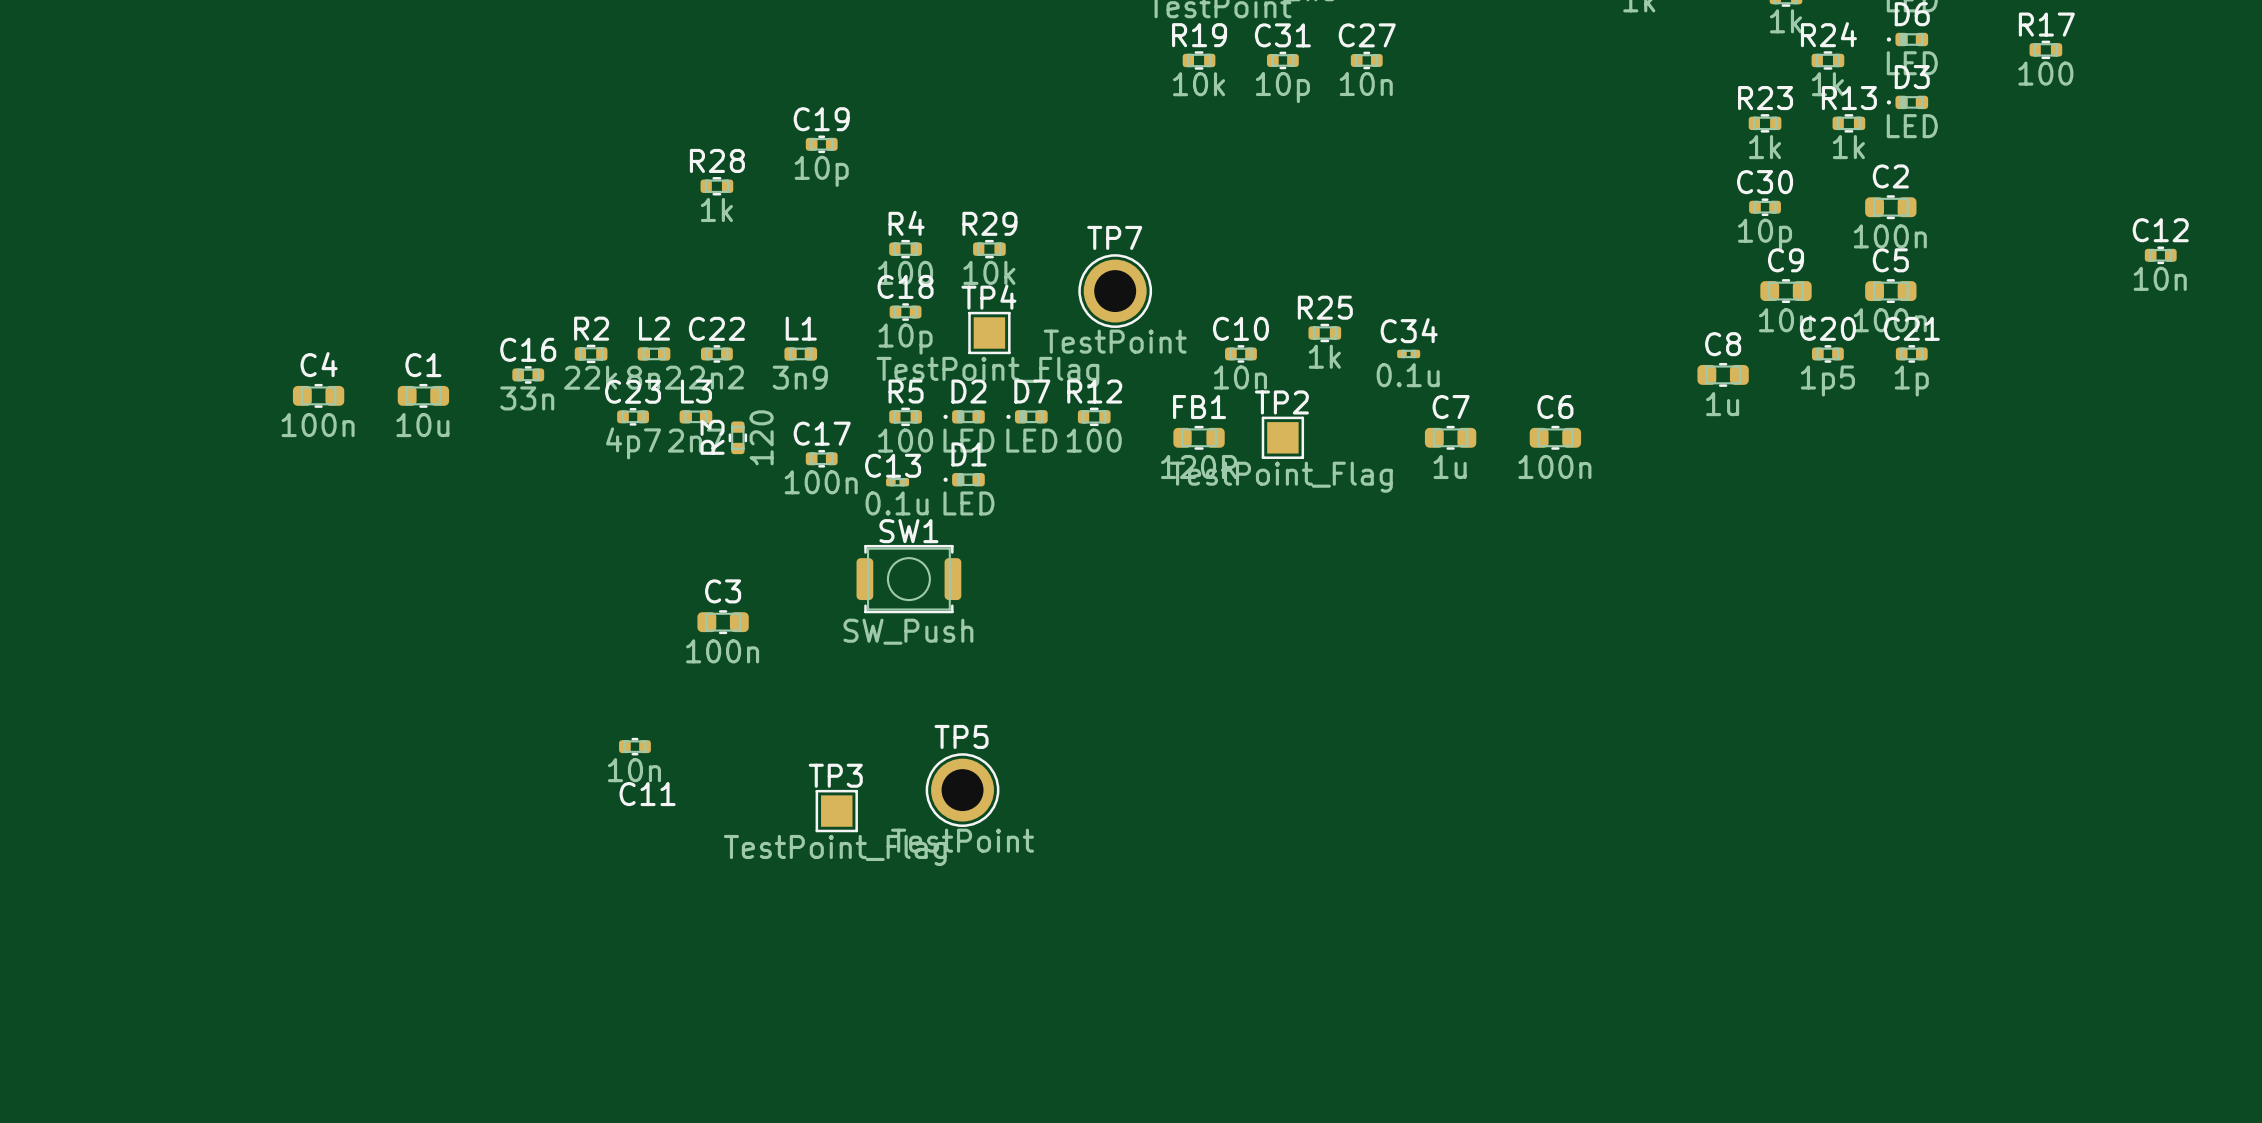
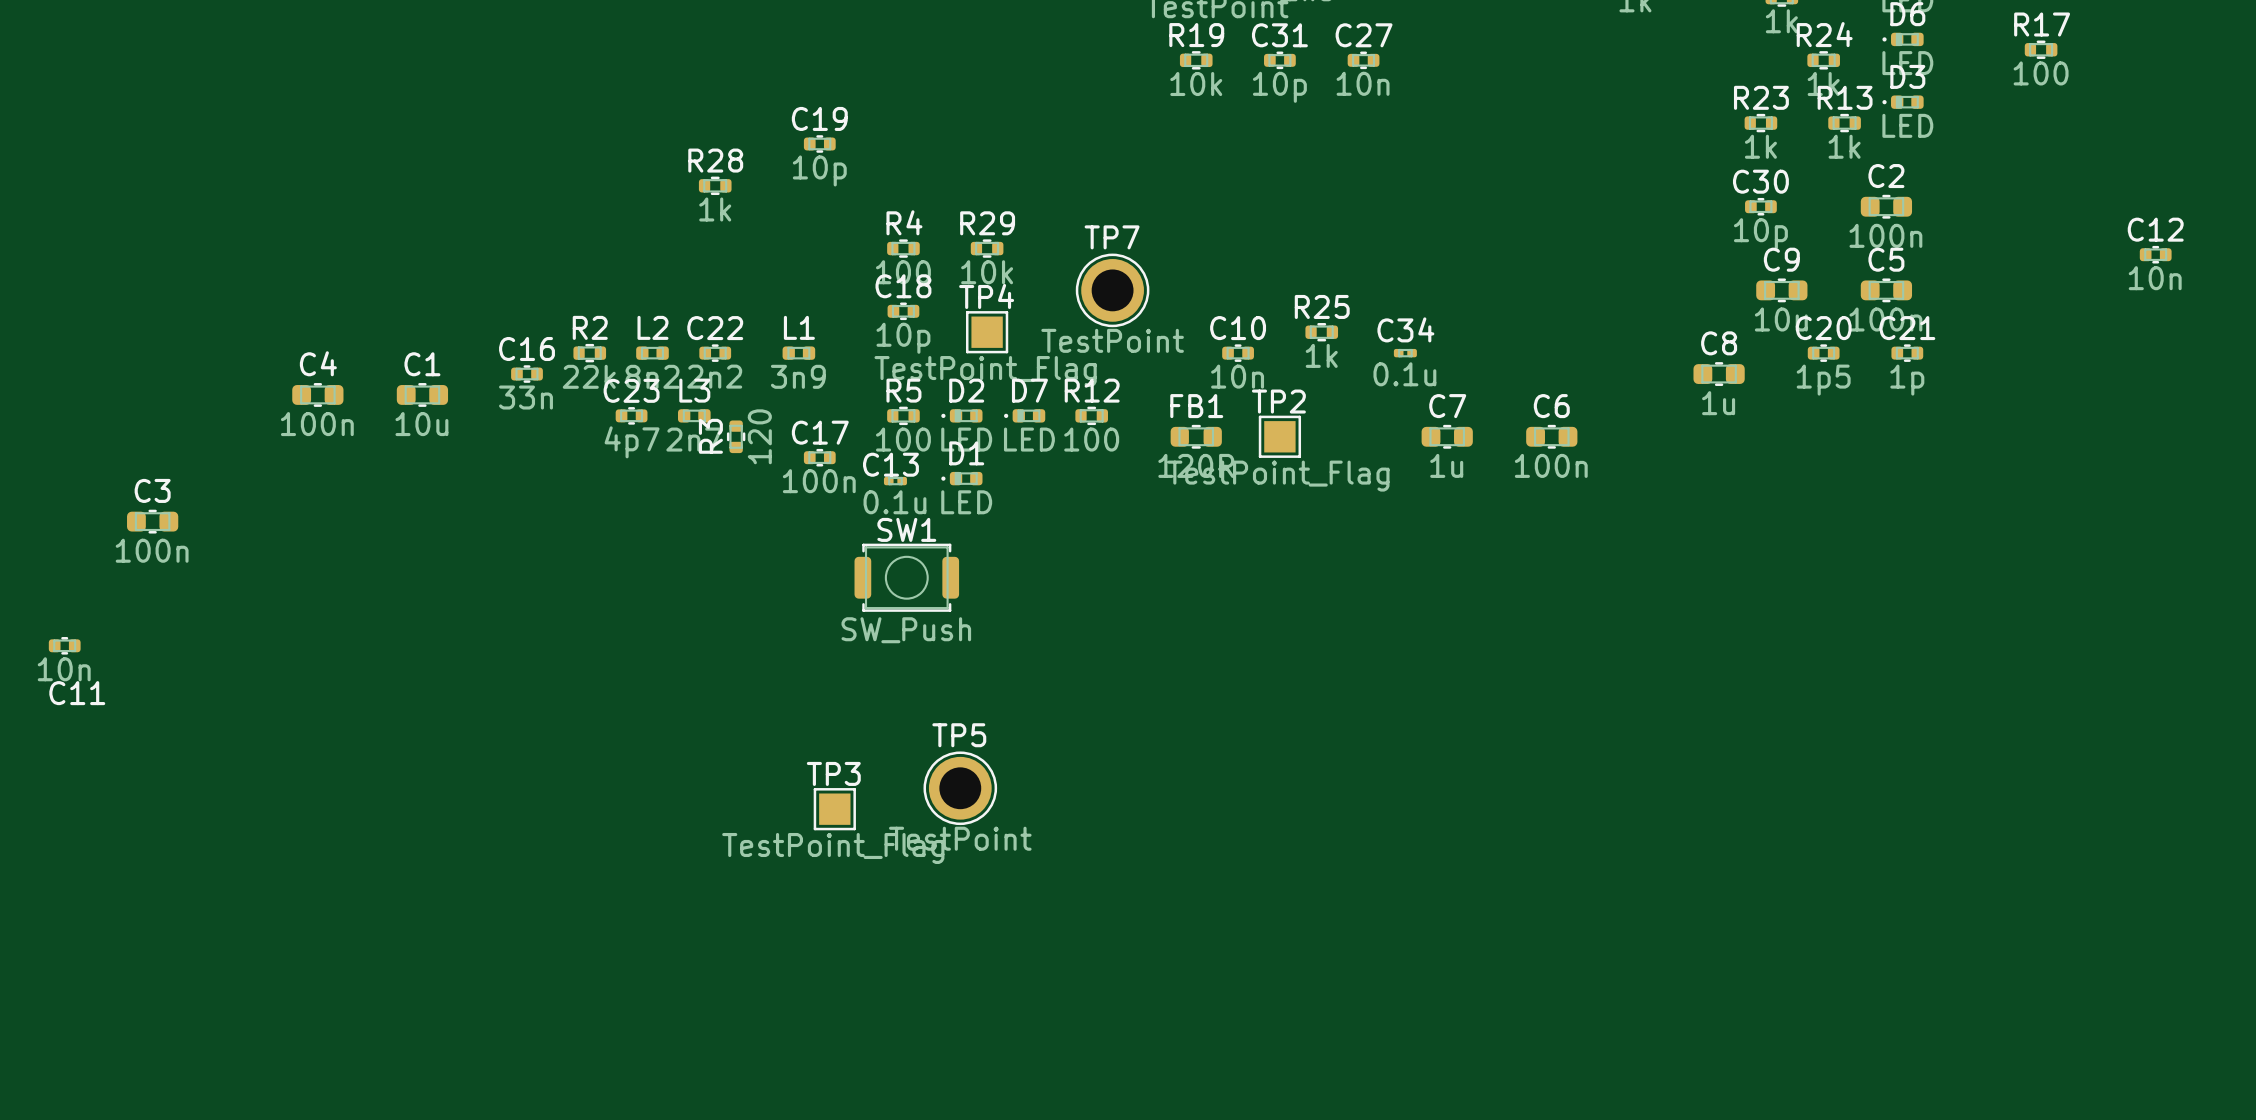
C3 position: (723, 622) -> (152, 521)
C11 position: (634, 746) -> (64, 645)

